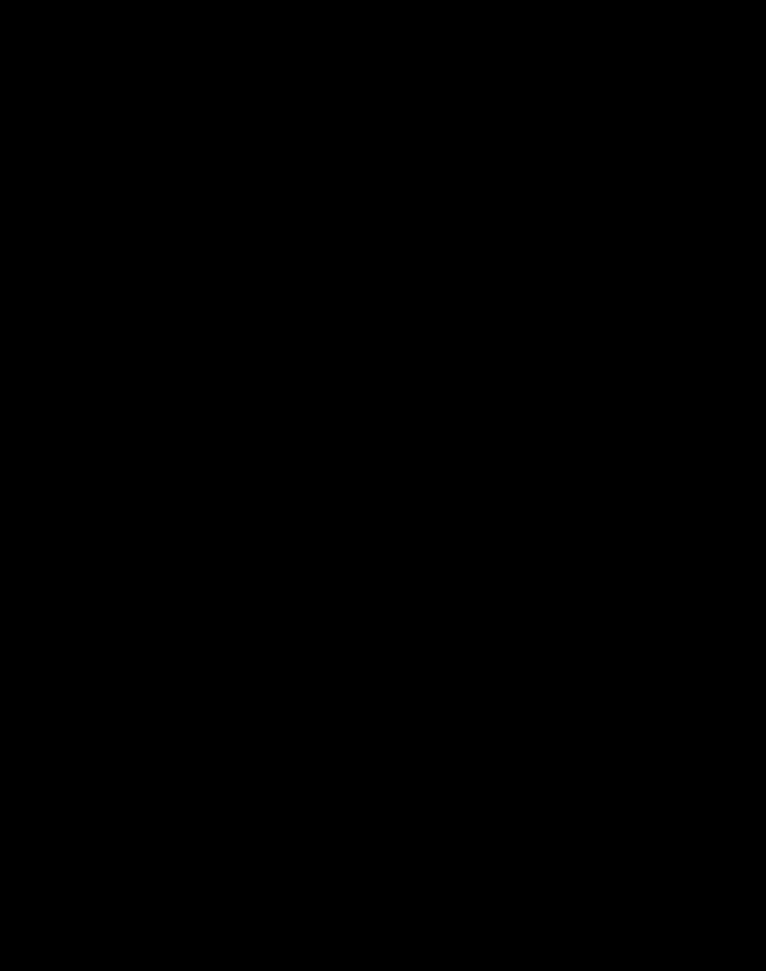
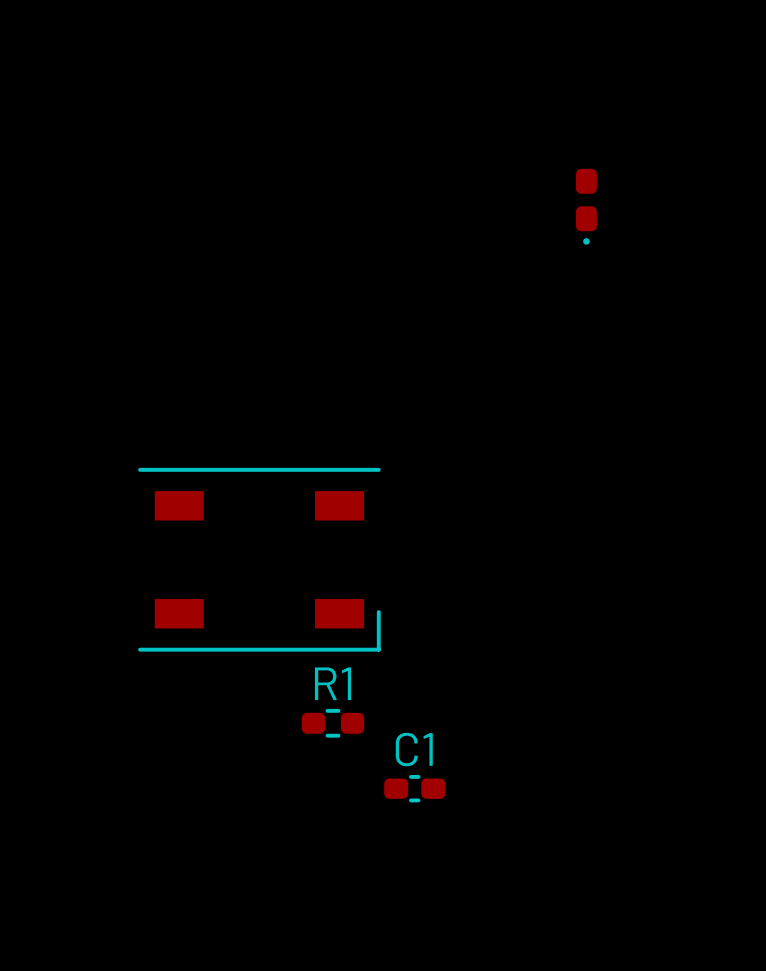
part: none -> (586, 206)
part: none -> (259, 559)
R1: none -> (333, 723)
C1: none -> (414, 788)

